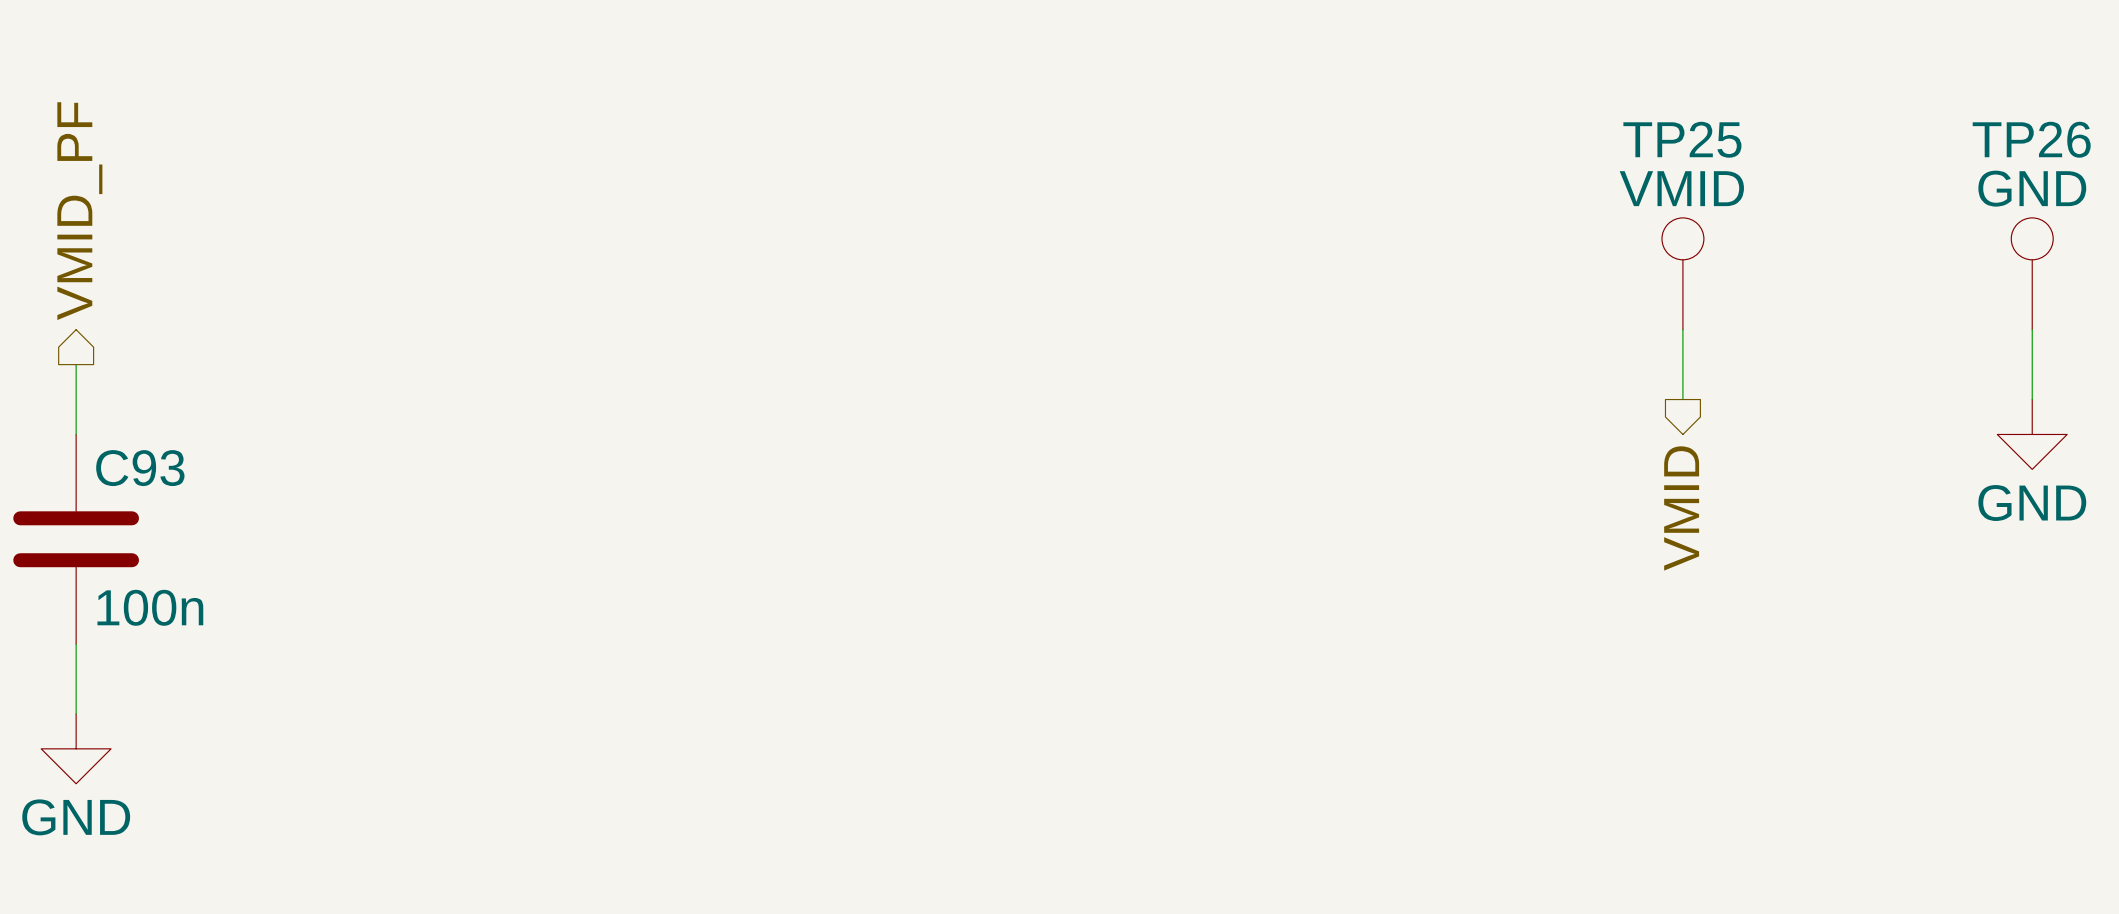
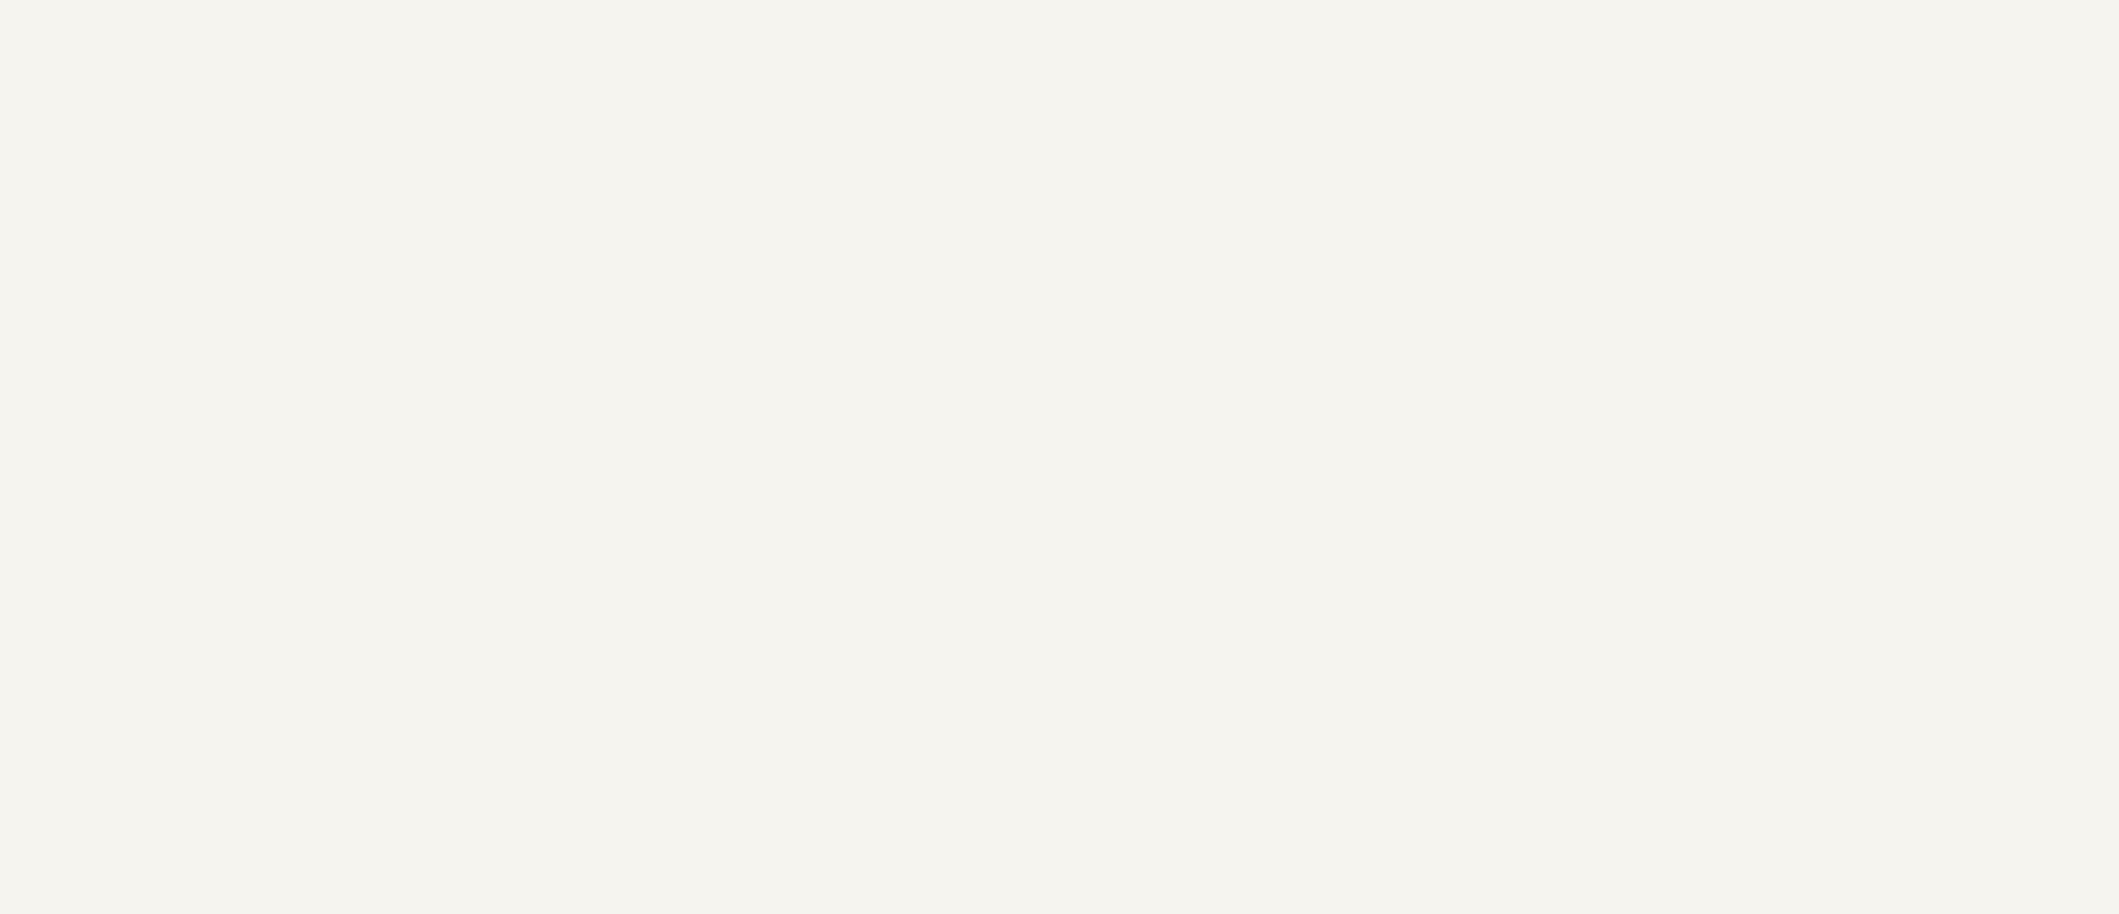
hierarchical label: VMID_PF (79, 211) -> none
TP25: VMID (1682, 273) -> none
TP26: GND (2032, 273) -> none
wire: (1682, 329) (1682, 399) -> none
wire: (2032, 329) (2032, 399) -> none
wire: (76, 364) (76, 434) -> none
power symbol: GND (2032, 434) -> none
hierarchical label: VMID (1681, 508) -> none
C93: 100n (76, 539) -> none
wire: (76, 644) (76, 713) -> none
power symbol: GND (76, 748) -> none

